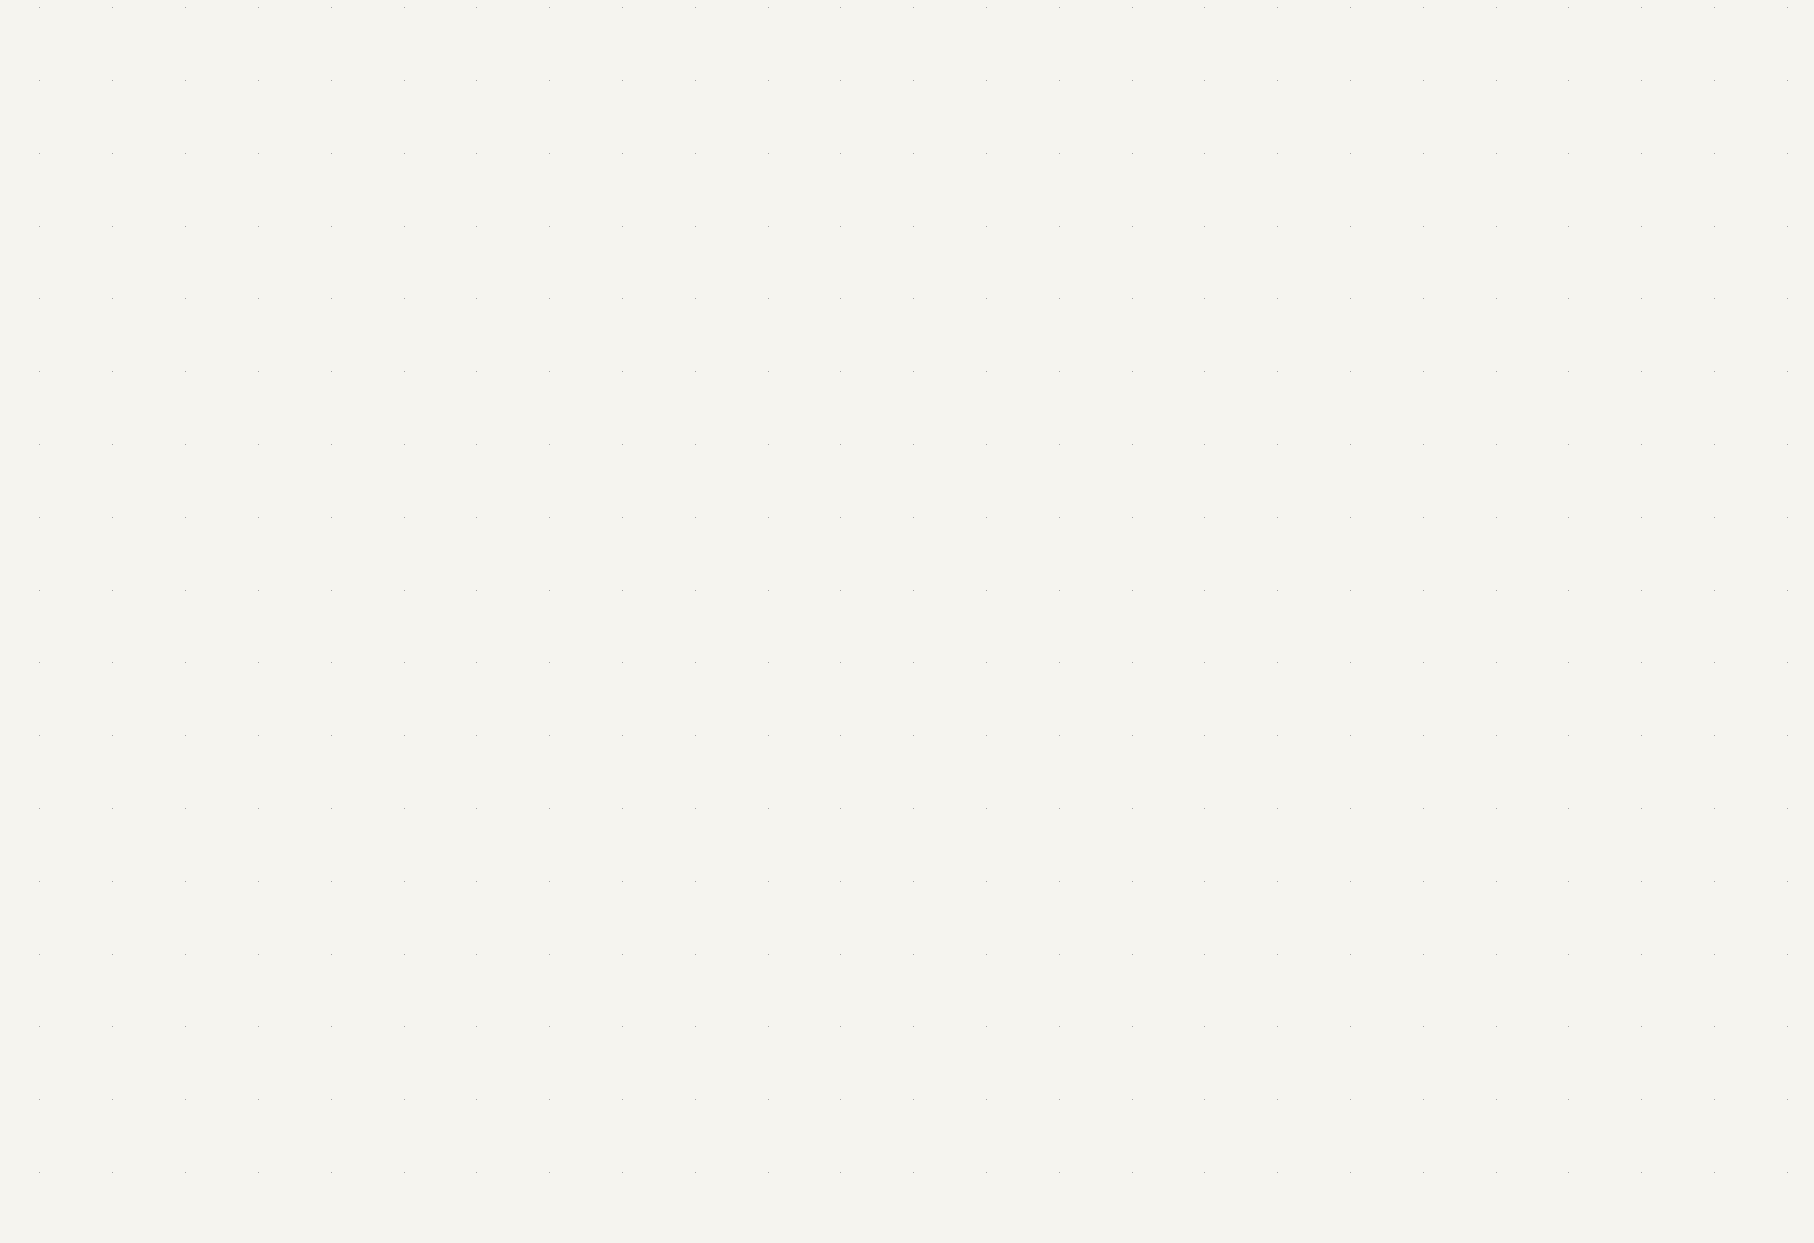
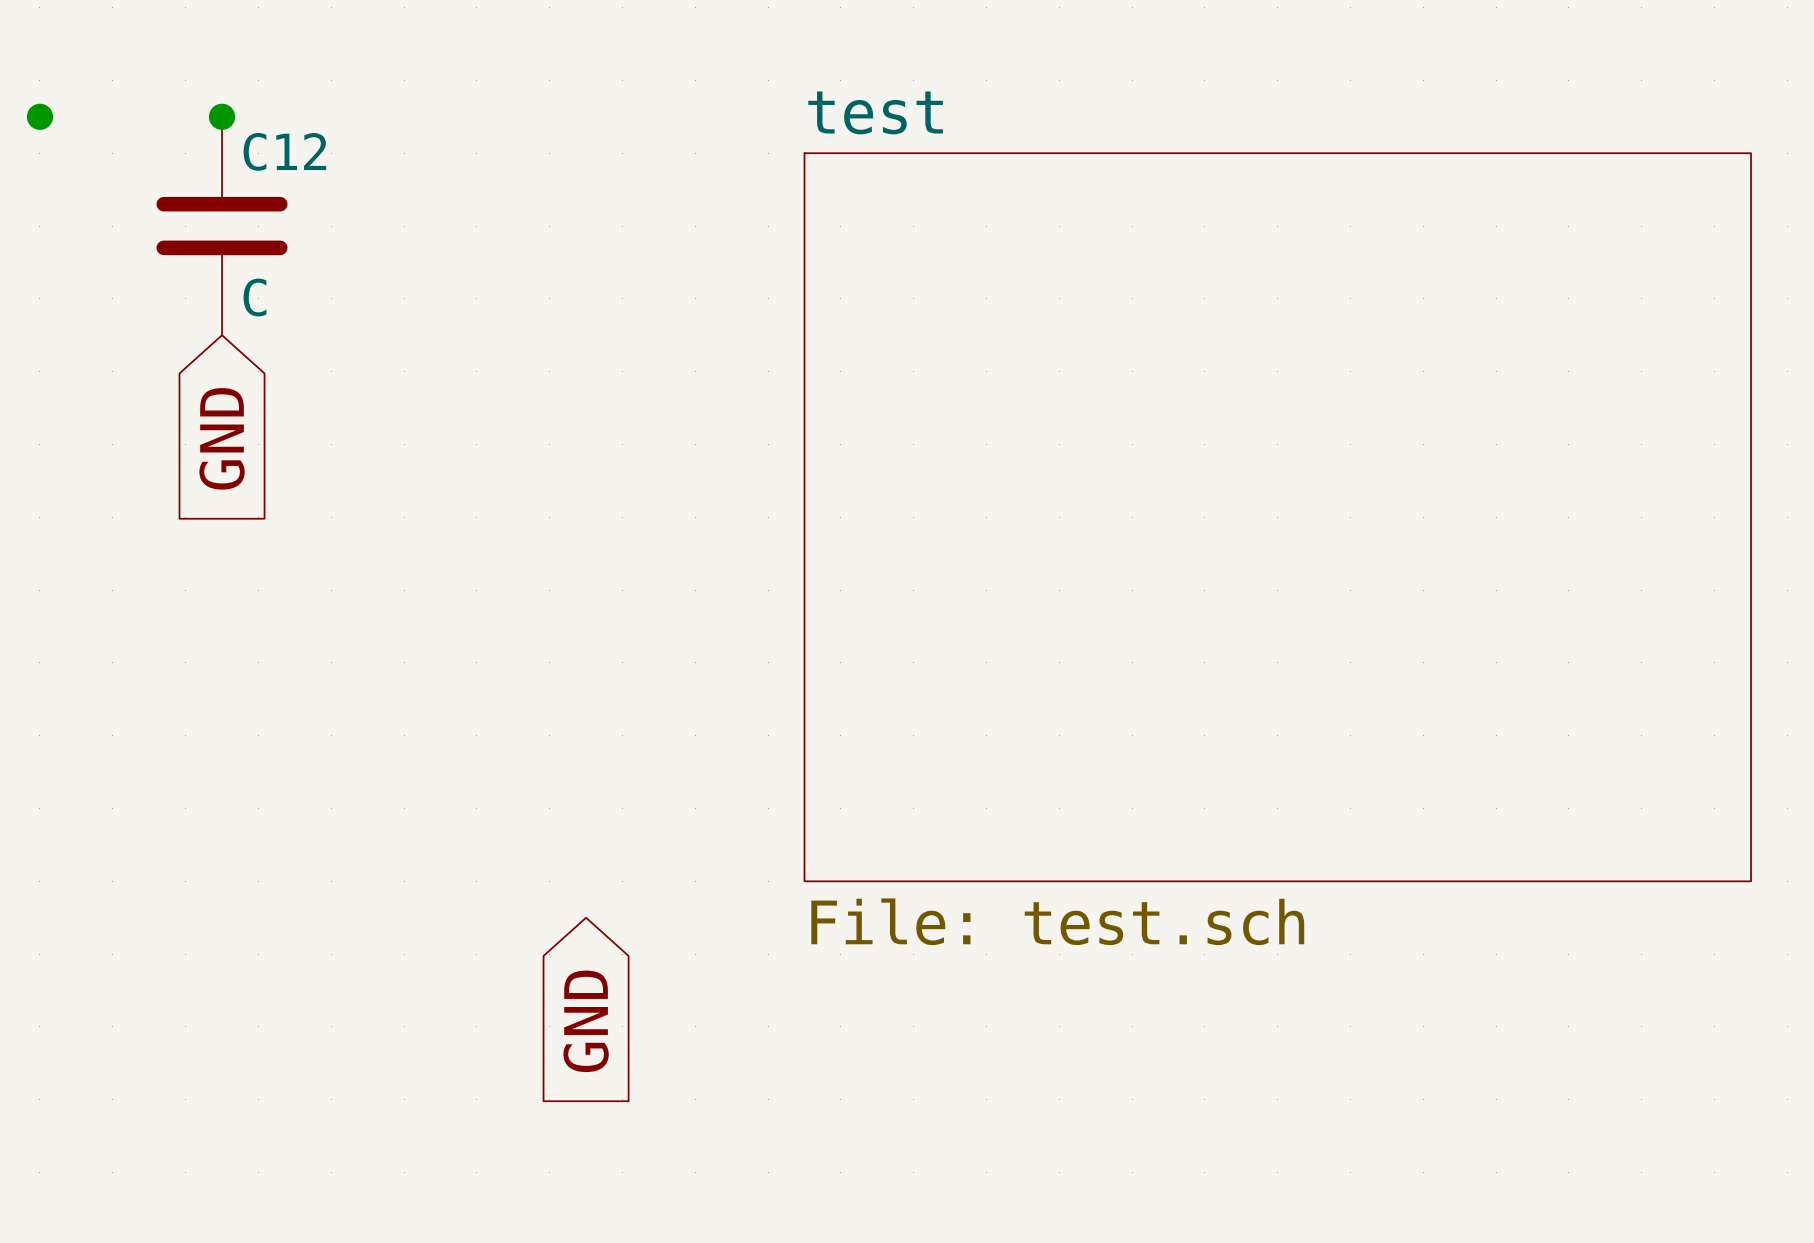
junction: none -> (39, 116)
junction: none -> (222, 116)
C12: none -> C (222, 226)
global label: none -> GND (222, 438)
sheet test: none -> File: test.sch (1277, 517)
global label: none -> GND (586, 1021)

